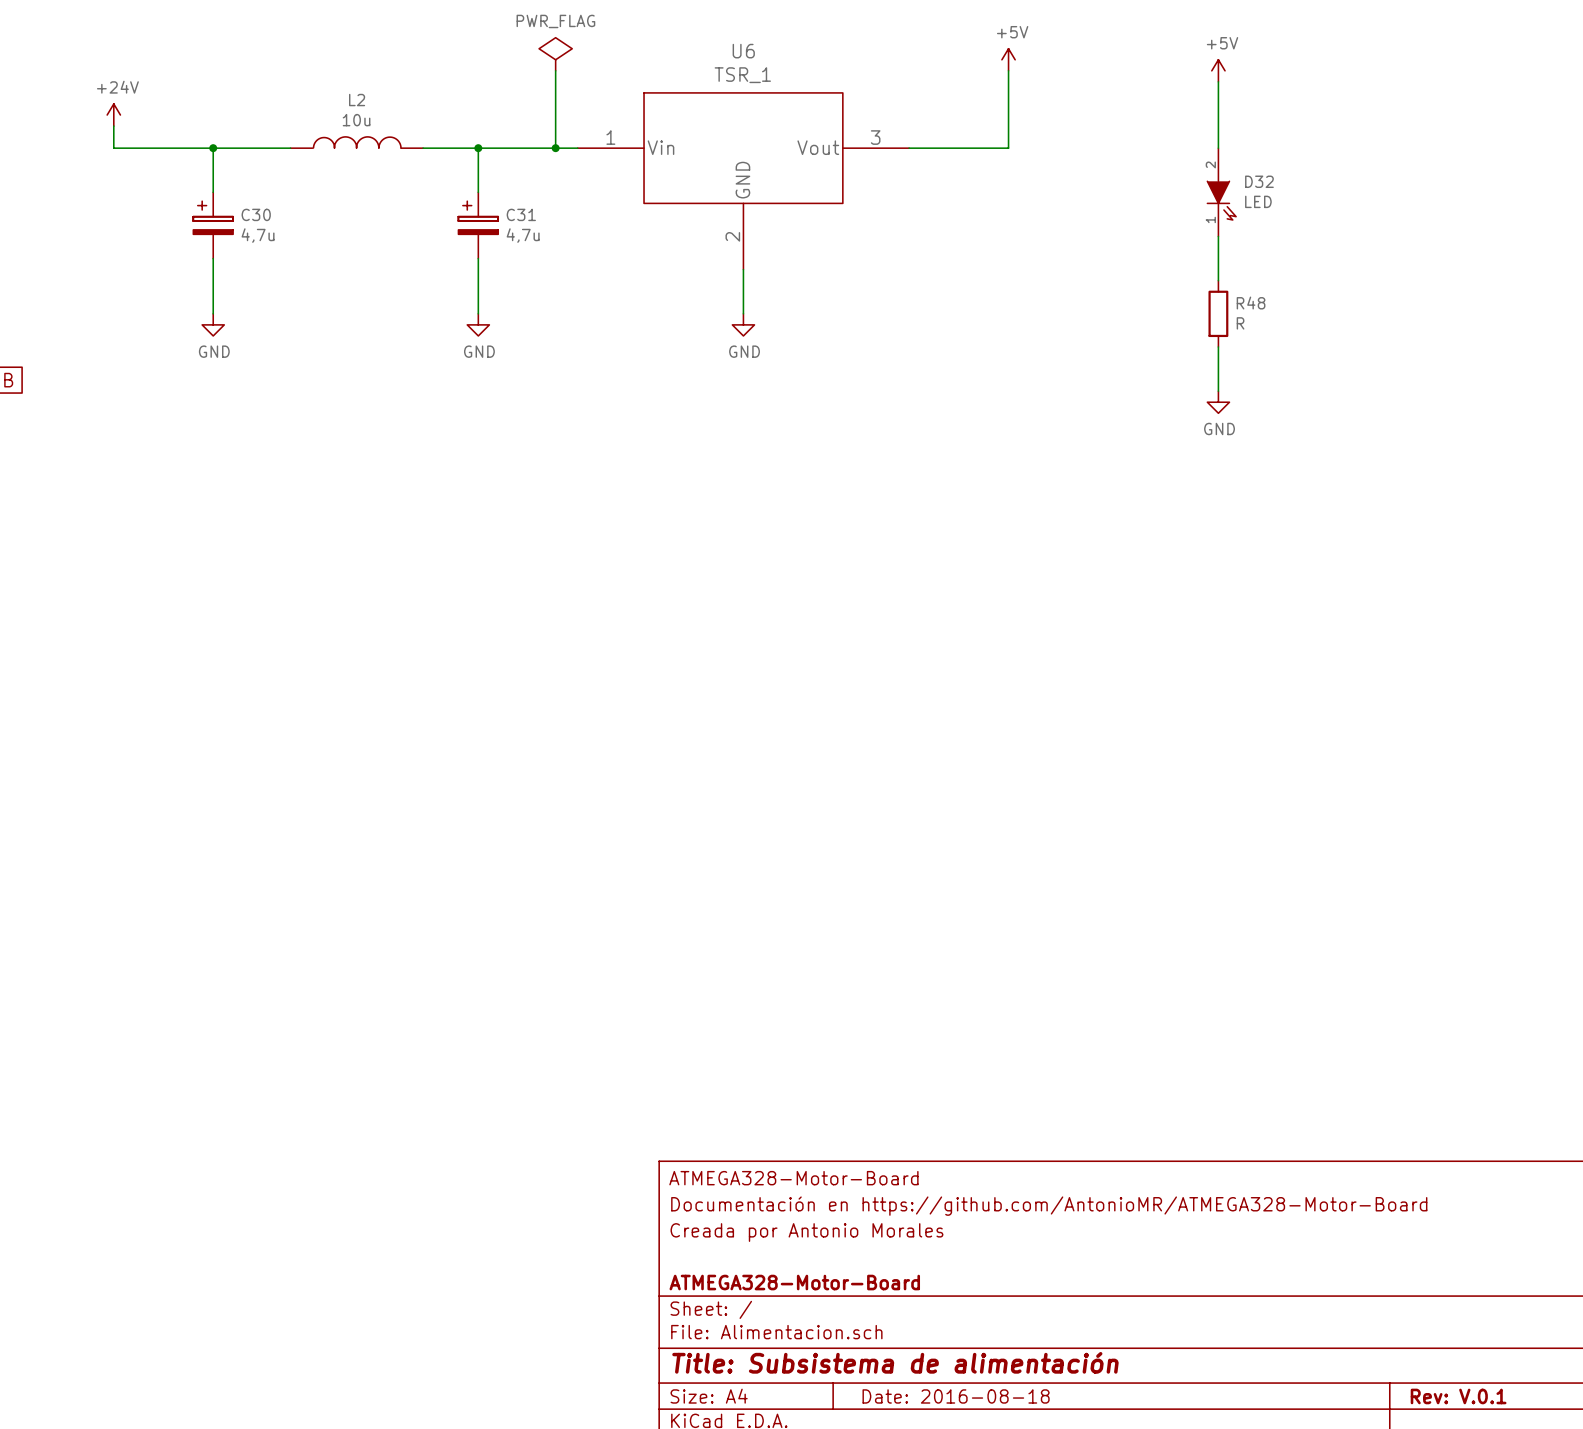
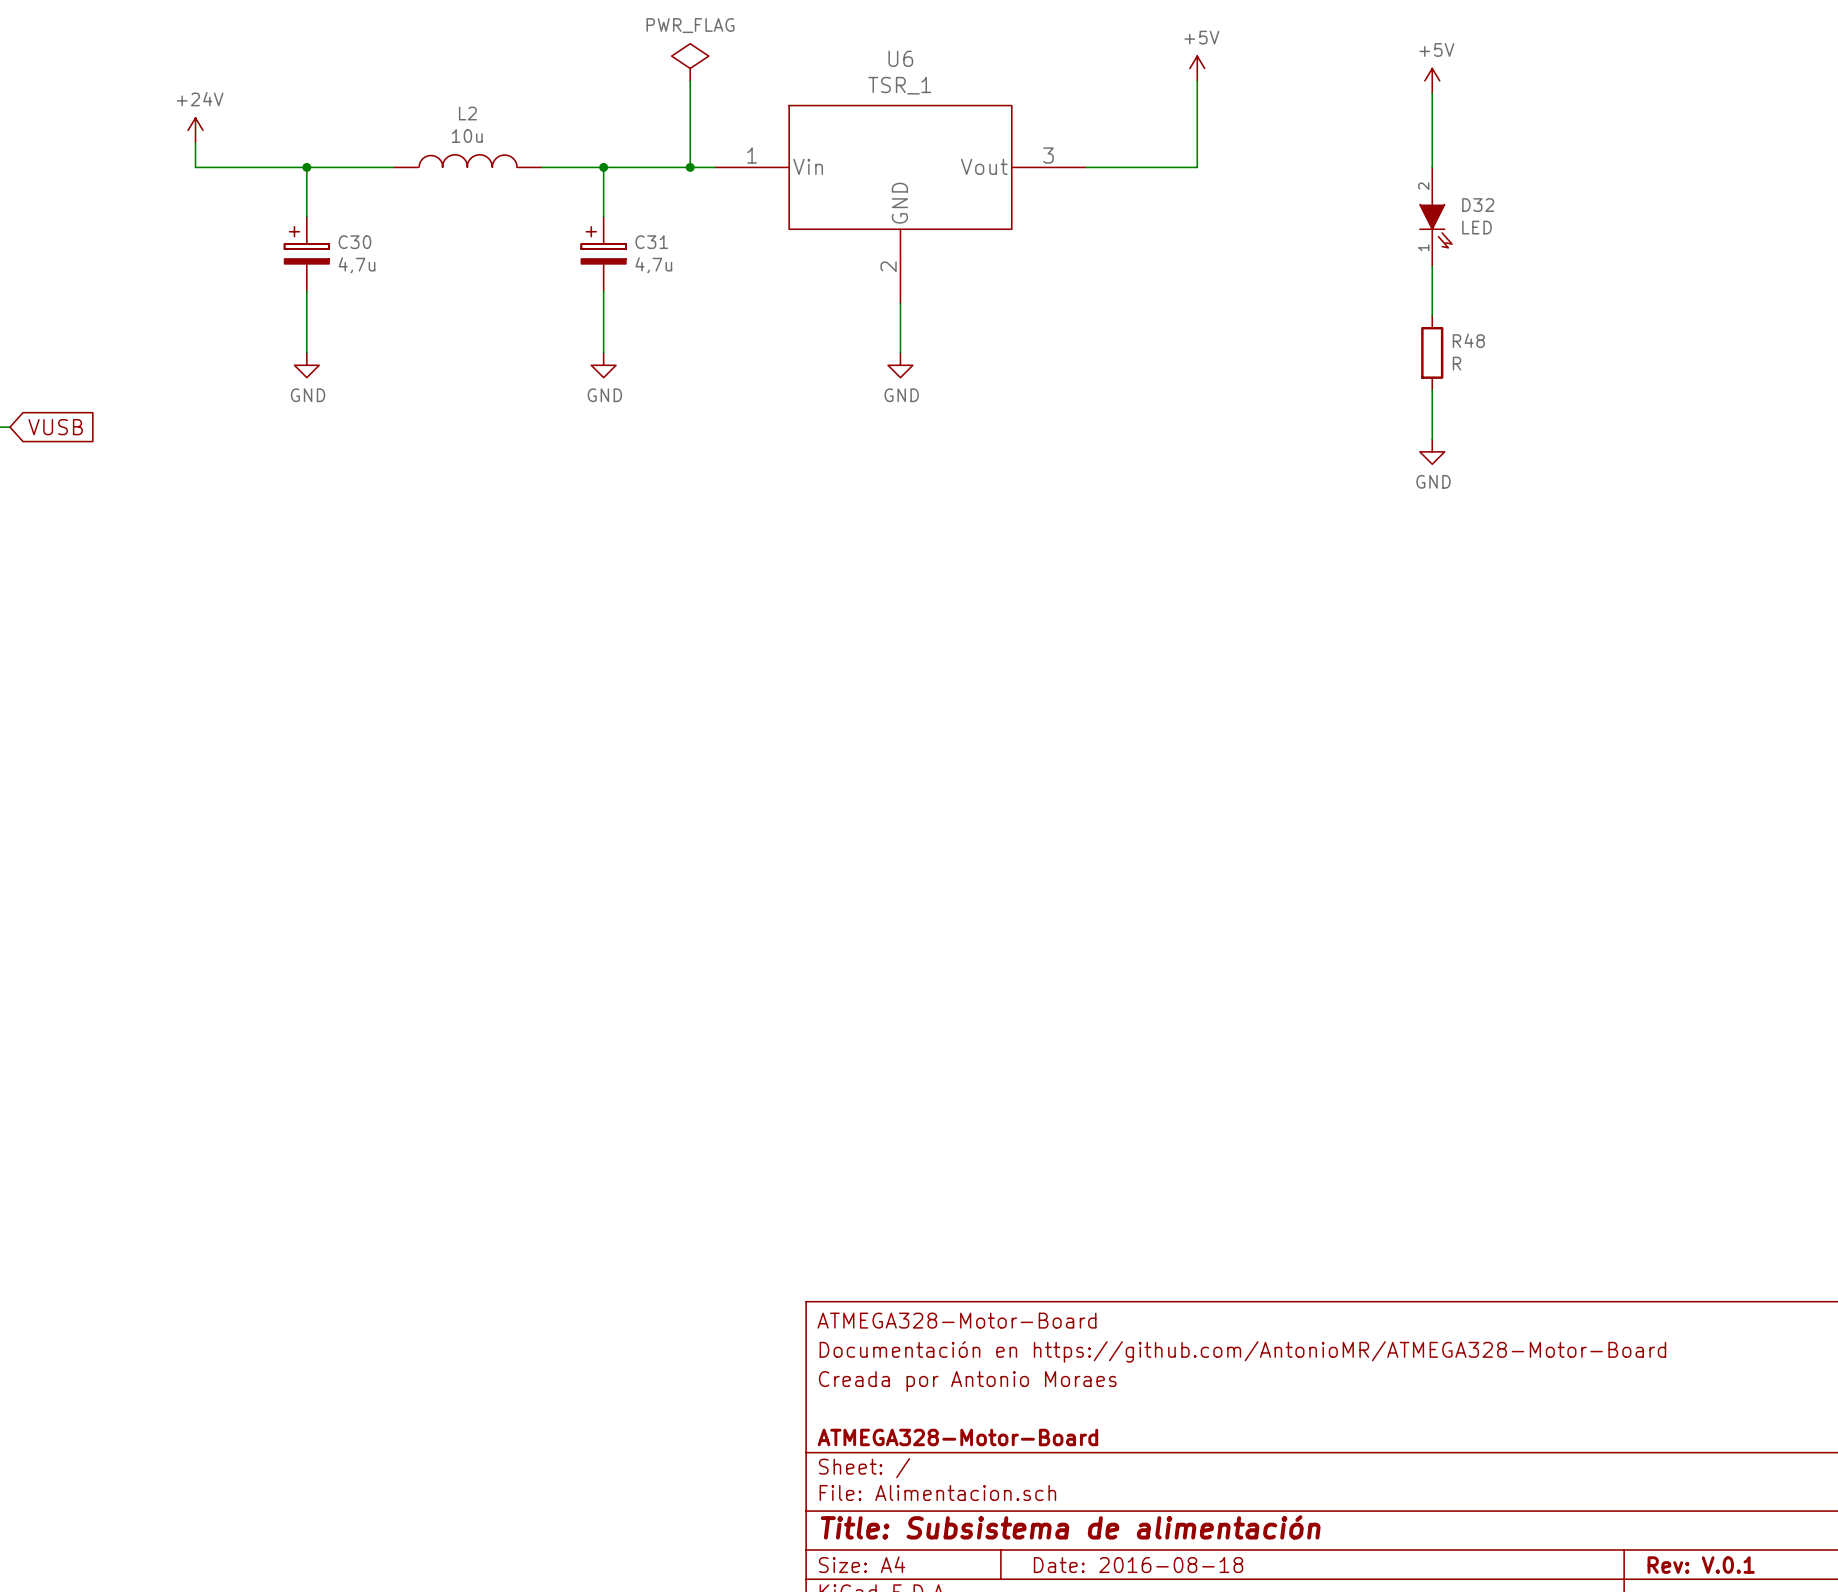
title block: Creada por Antonio Morales (806, 1232) -> Creada por Antonio Moraes (967, 1381)

